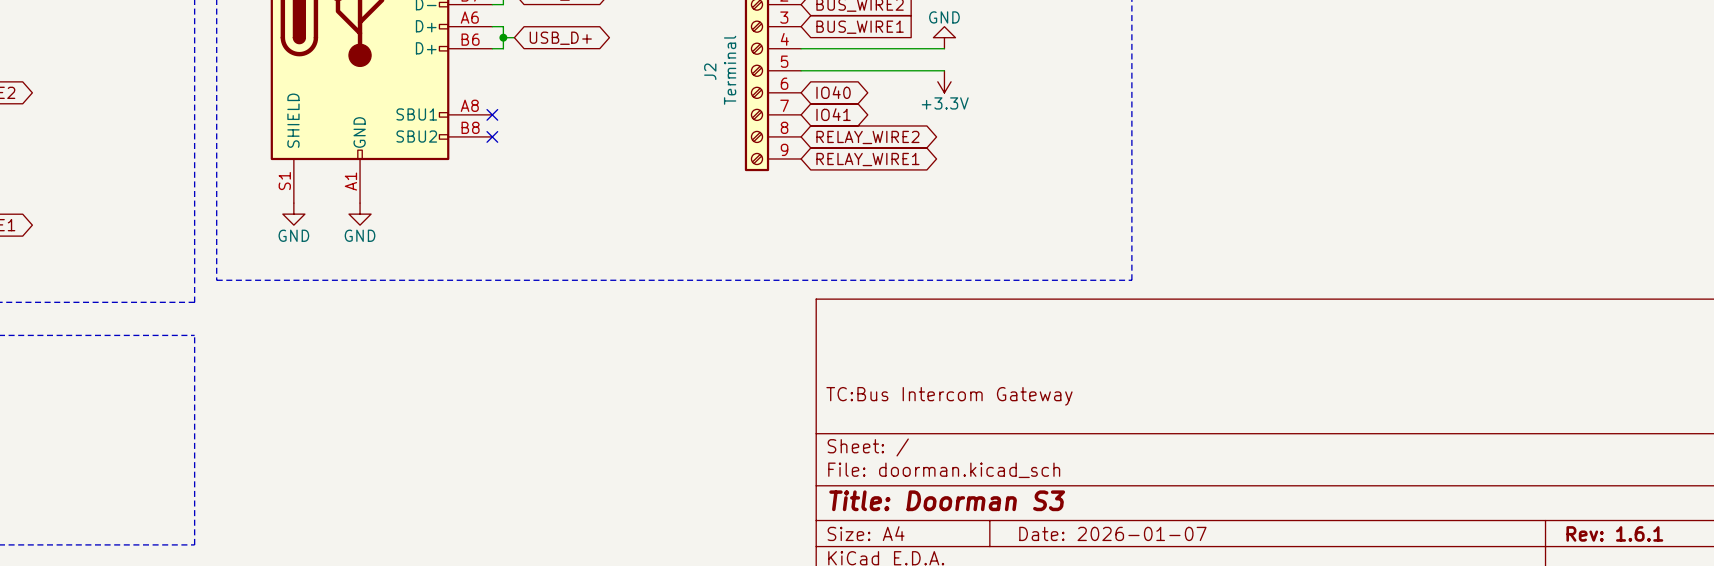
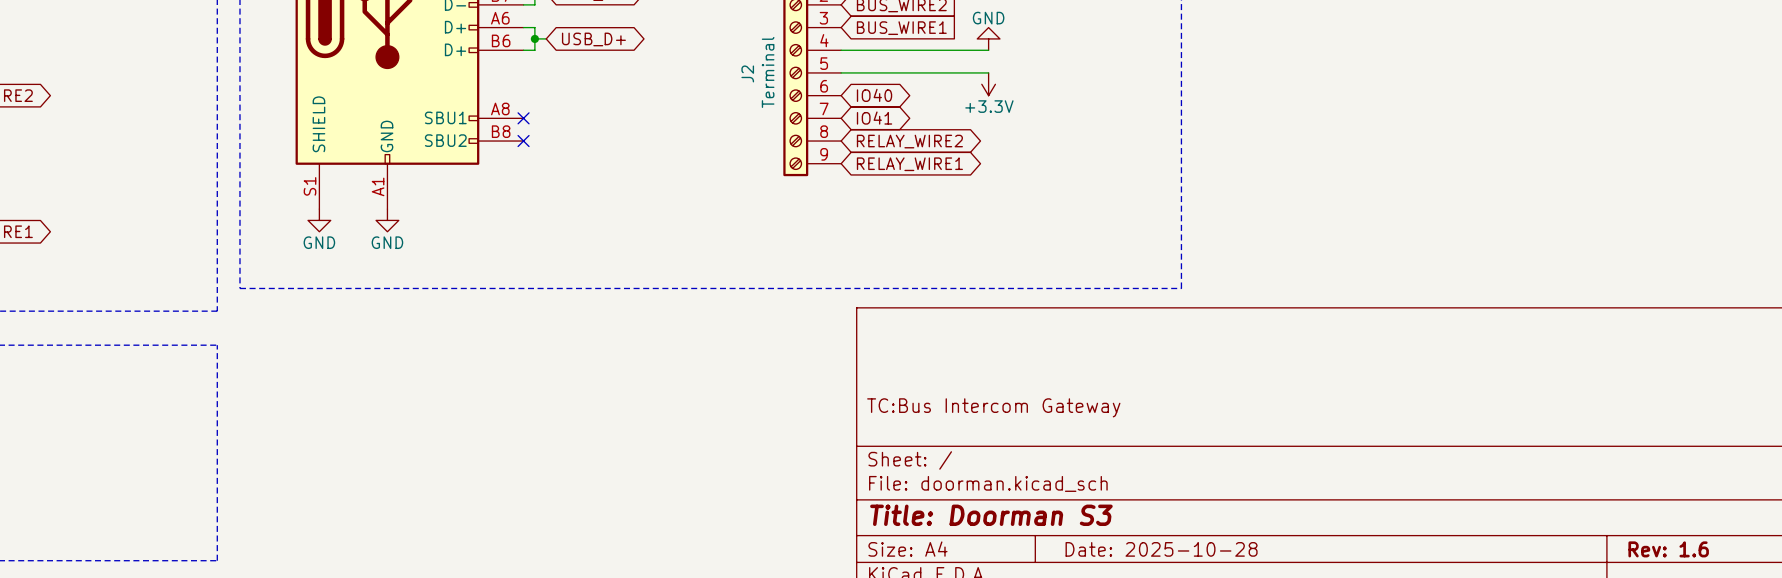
title block: Date: 2026-01-07 (1112, 533) -> Date: 2025-10-28 (1161, 549)
title block: Rev: 1.6.1 (1614, 533) -> Rev: 1.6 (1668, 549)

